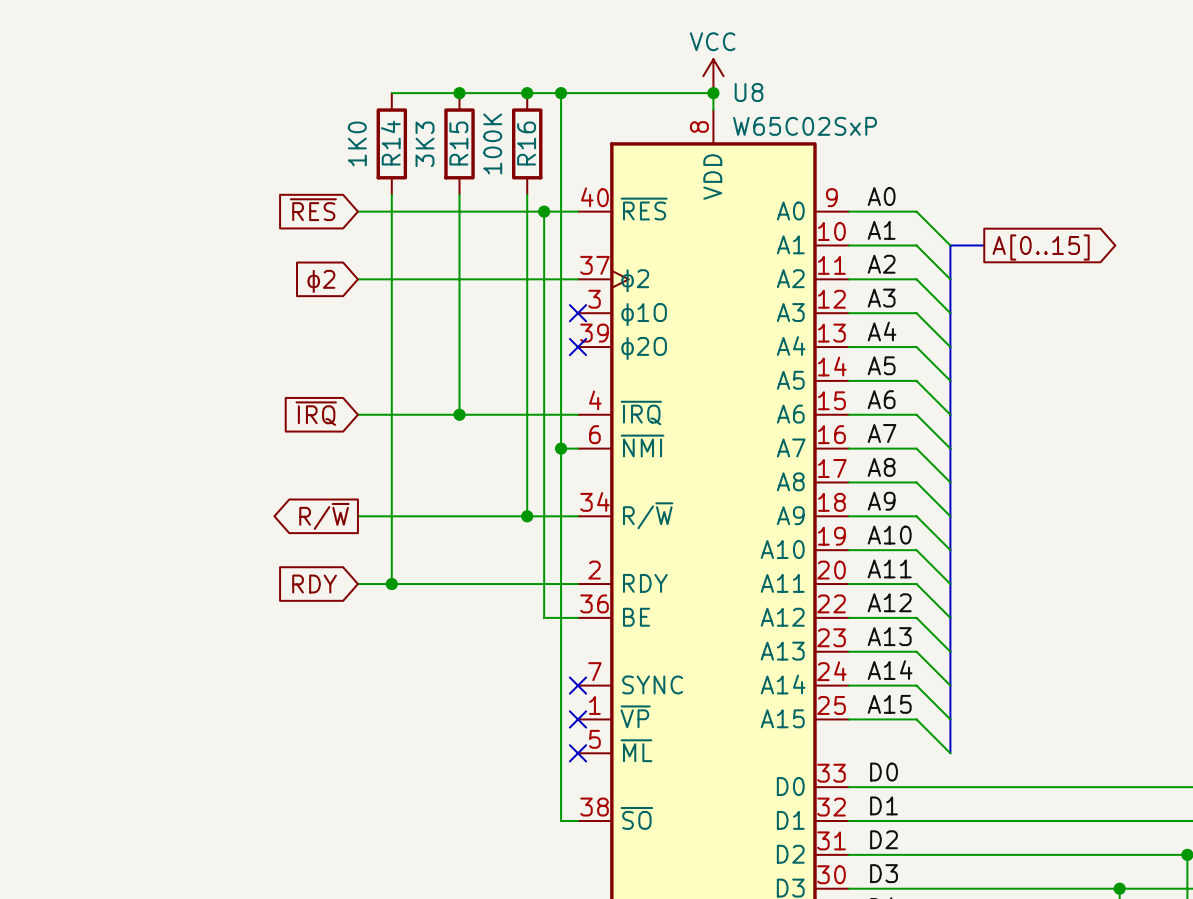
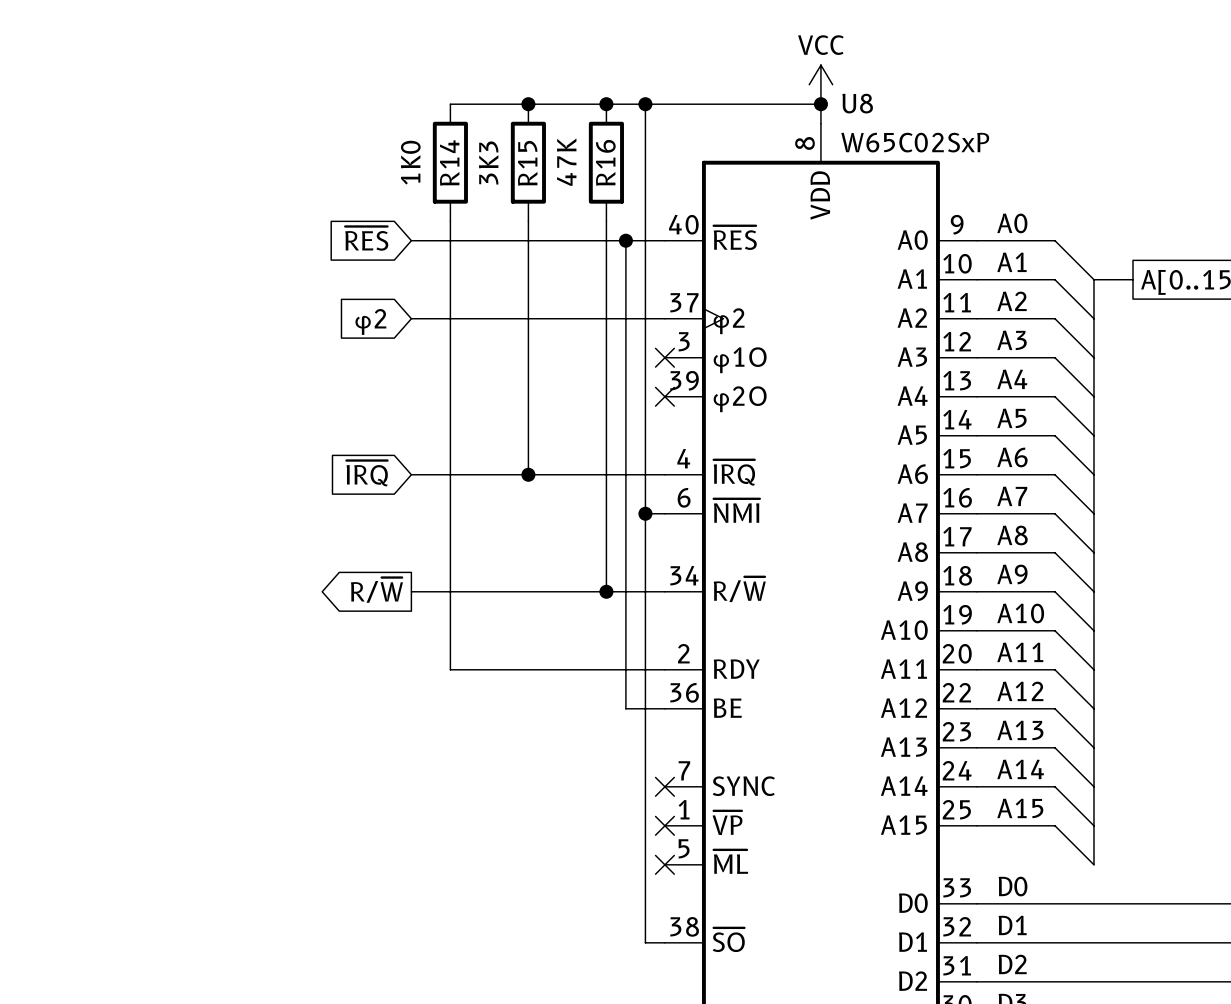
R16 value: 100K (492, 143) -> 47K (566, 162)
global label: RDY (314, 584) -> none
wire: (357, 584) (391, 584) -> none
junction: (391, 584) -> none

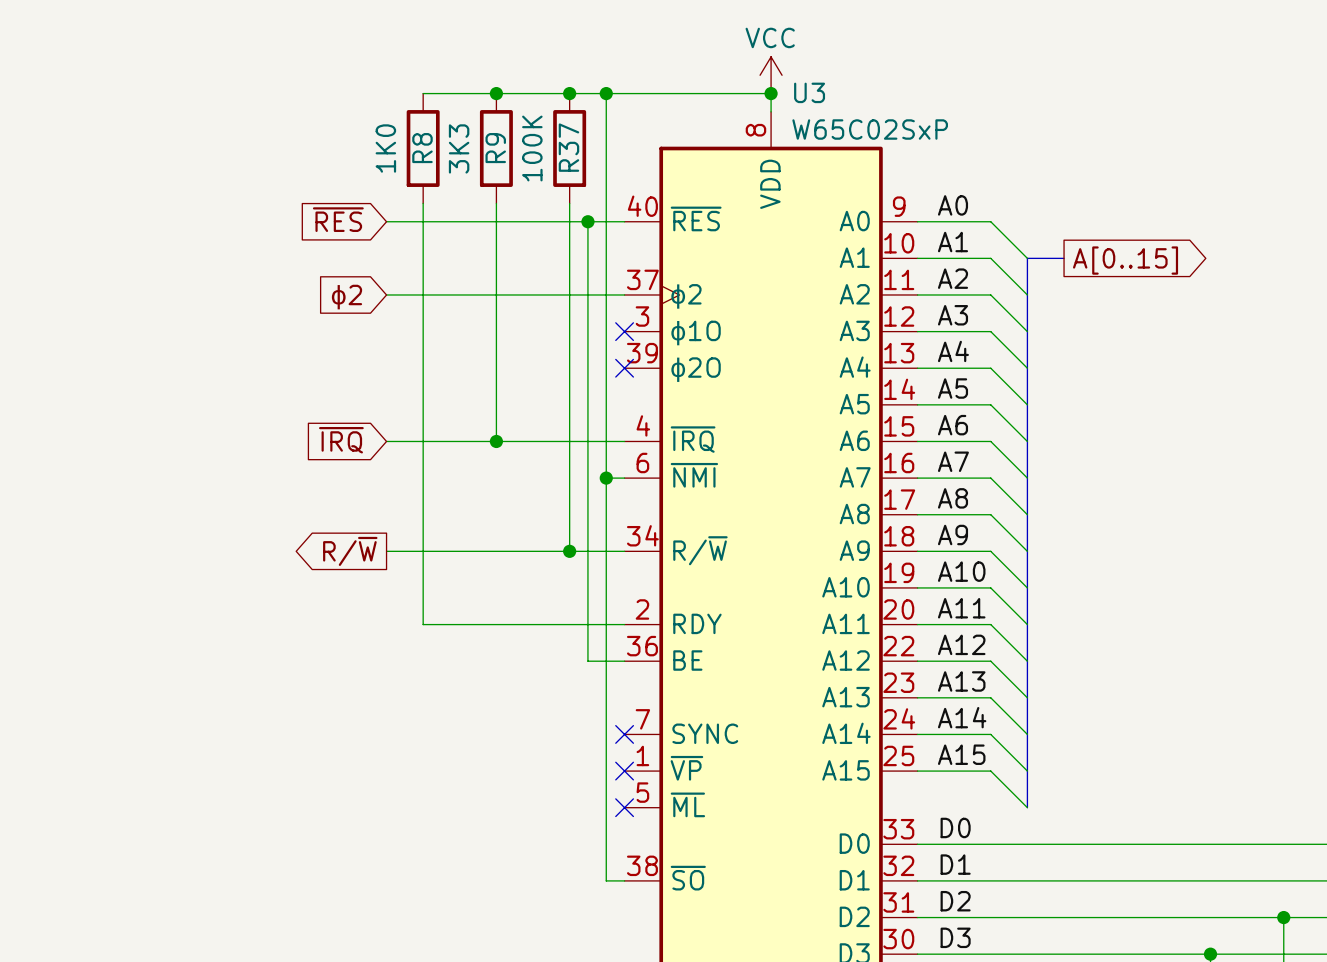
U8 name: U8 (857, 103) -> U3 (809, 92)
R16 value: 47K (566, 162) -> 100K (532, 148)
R16 name: R16 (605, 162) -> R37 (568, 147)
R14 name: R14 (449, 163) -> R8 (422, 148)
R15 name: R15 (527, 163) -> R9 (495, 148)

